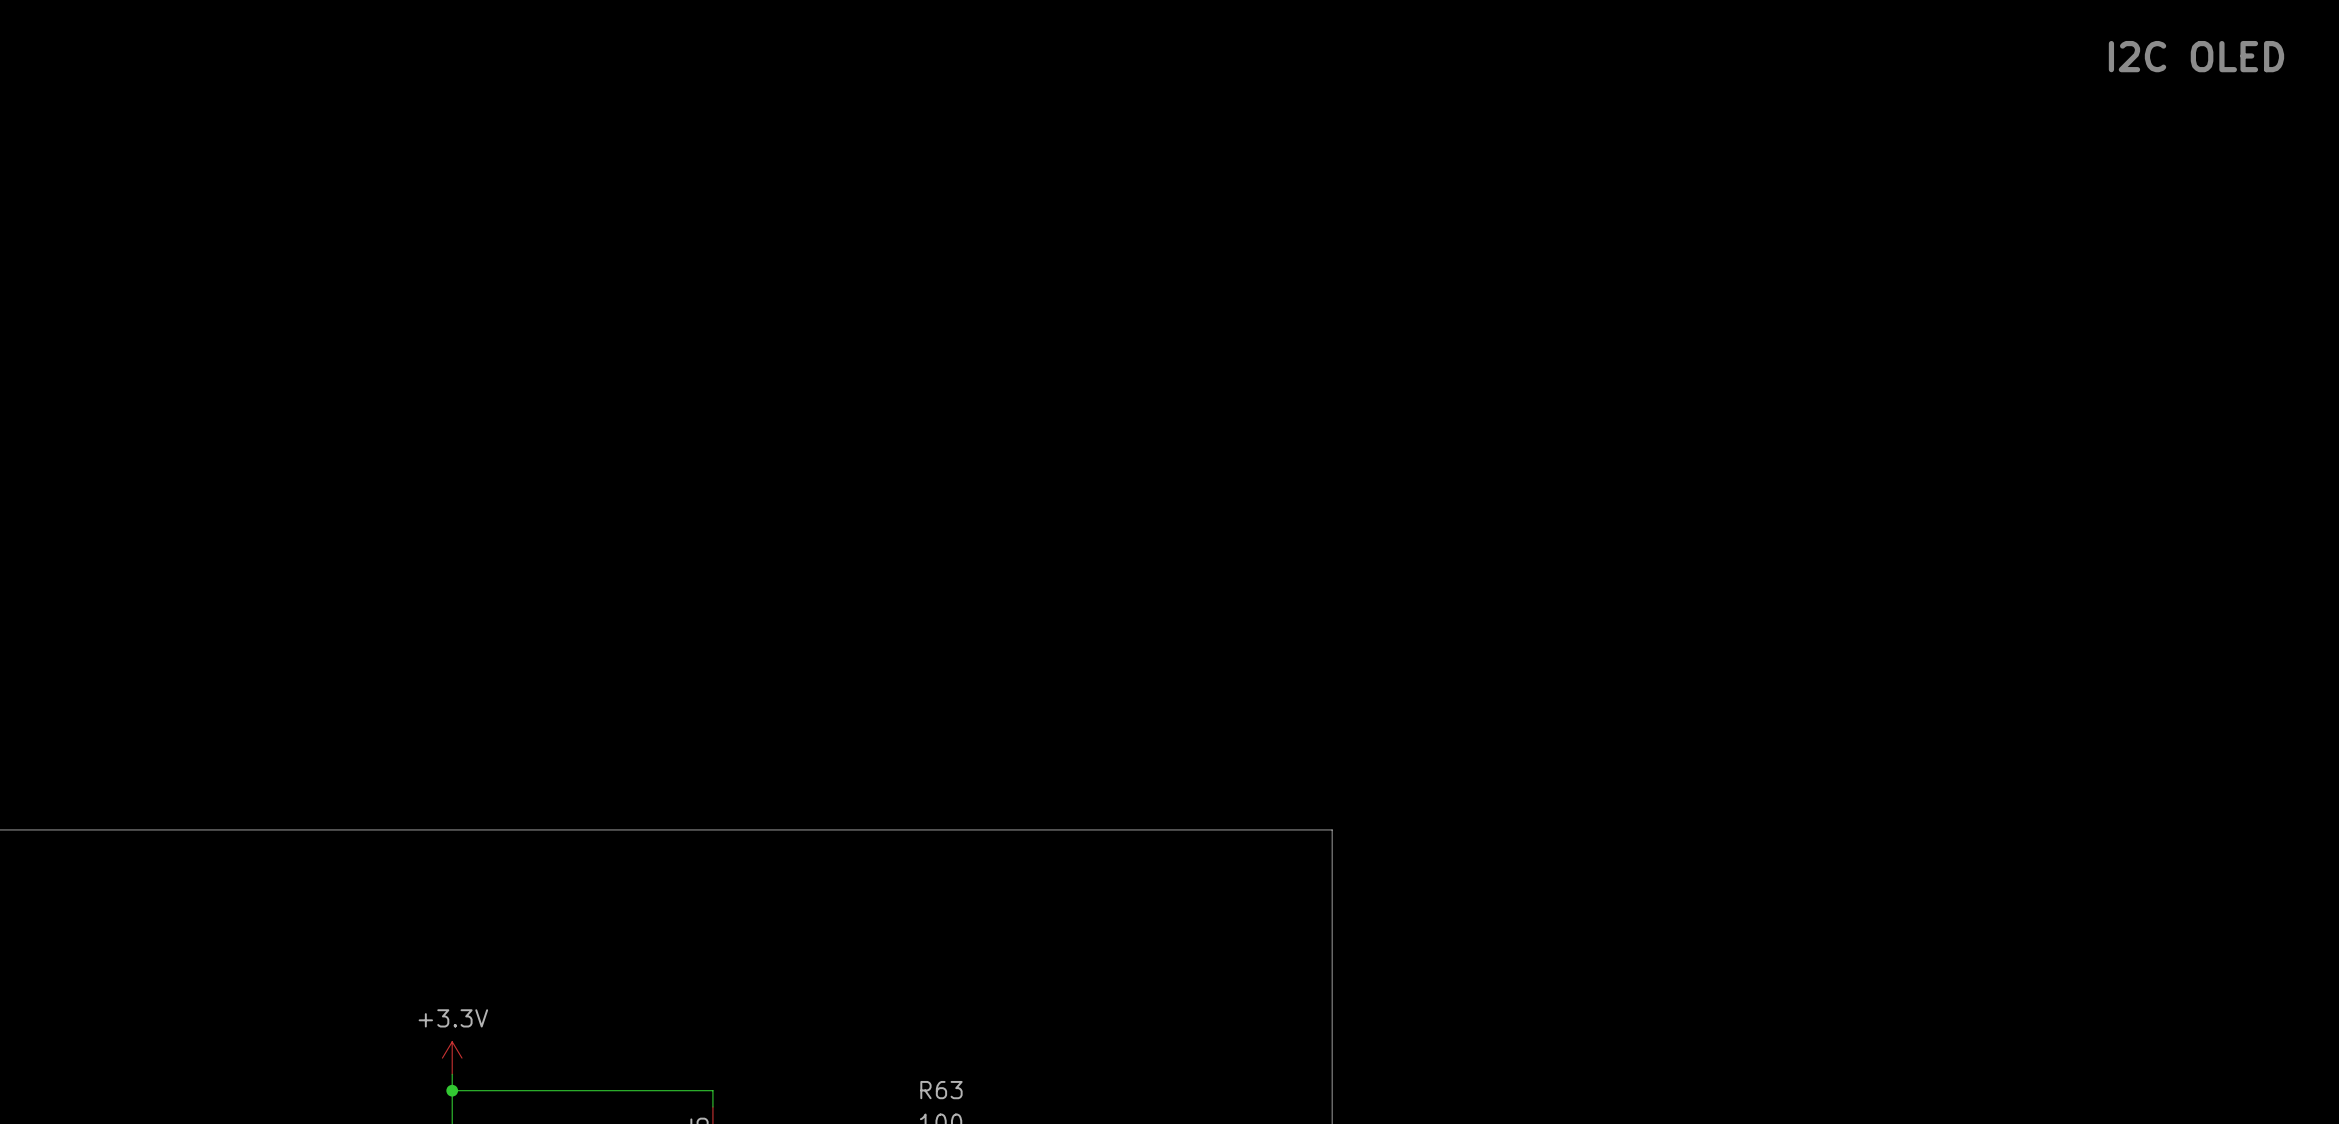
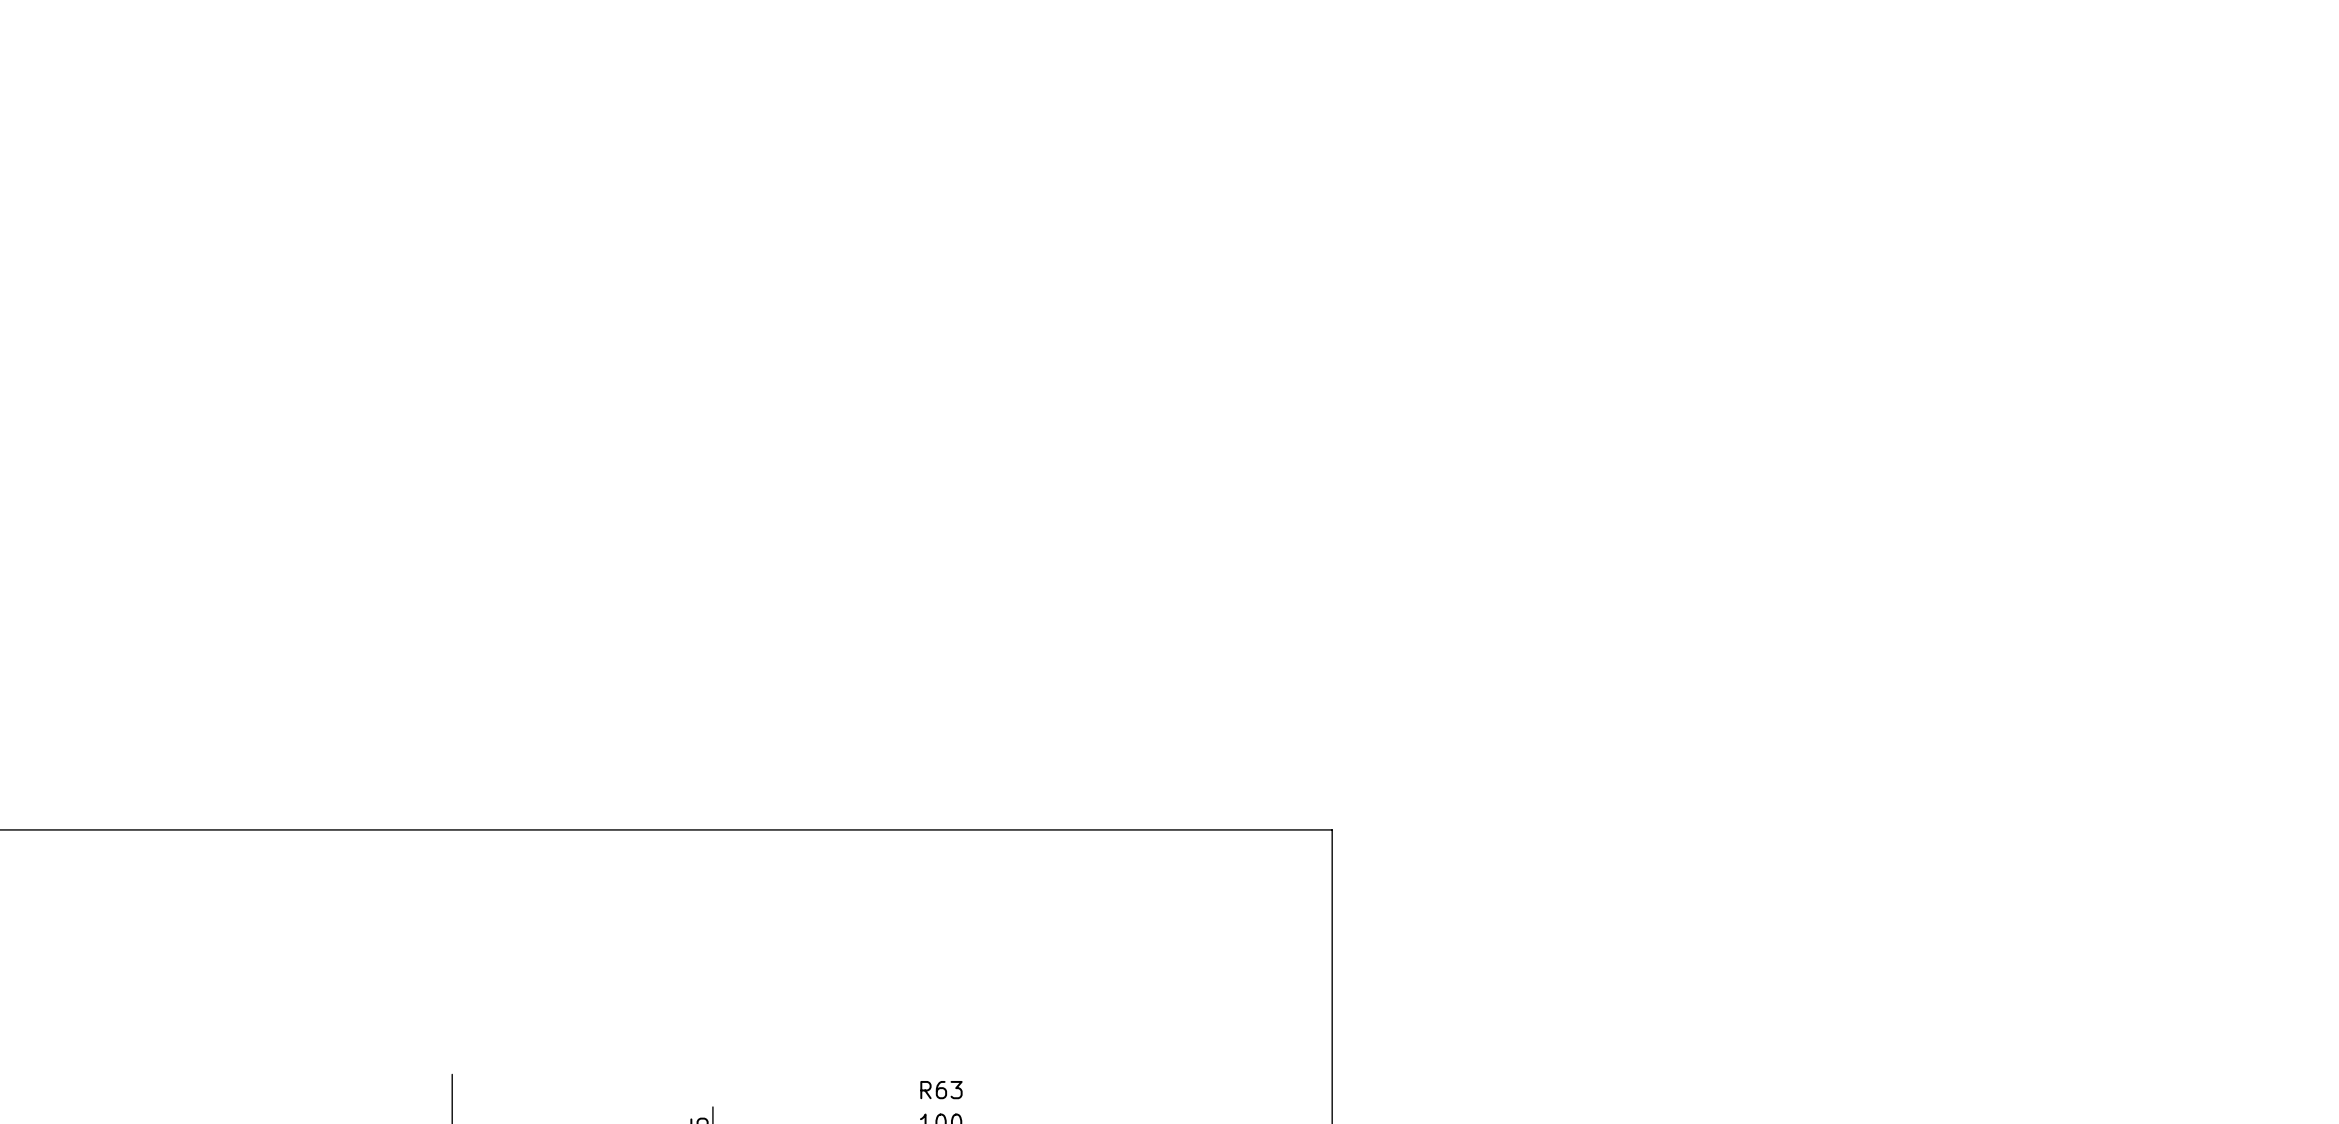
text: I2C OLED (2196, 56) -> none
power symbol: +3.3V (452, 1058) -> none
wire: (452, 1090) (712, 1090) (712, 1106) -> none
junction: (452, 1090) -> none

